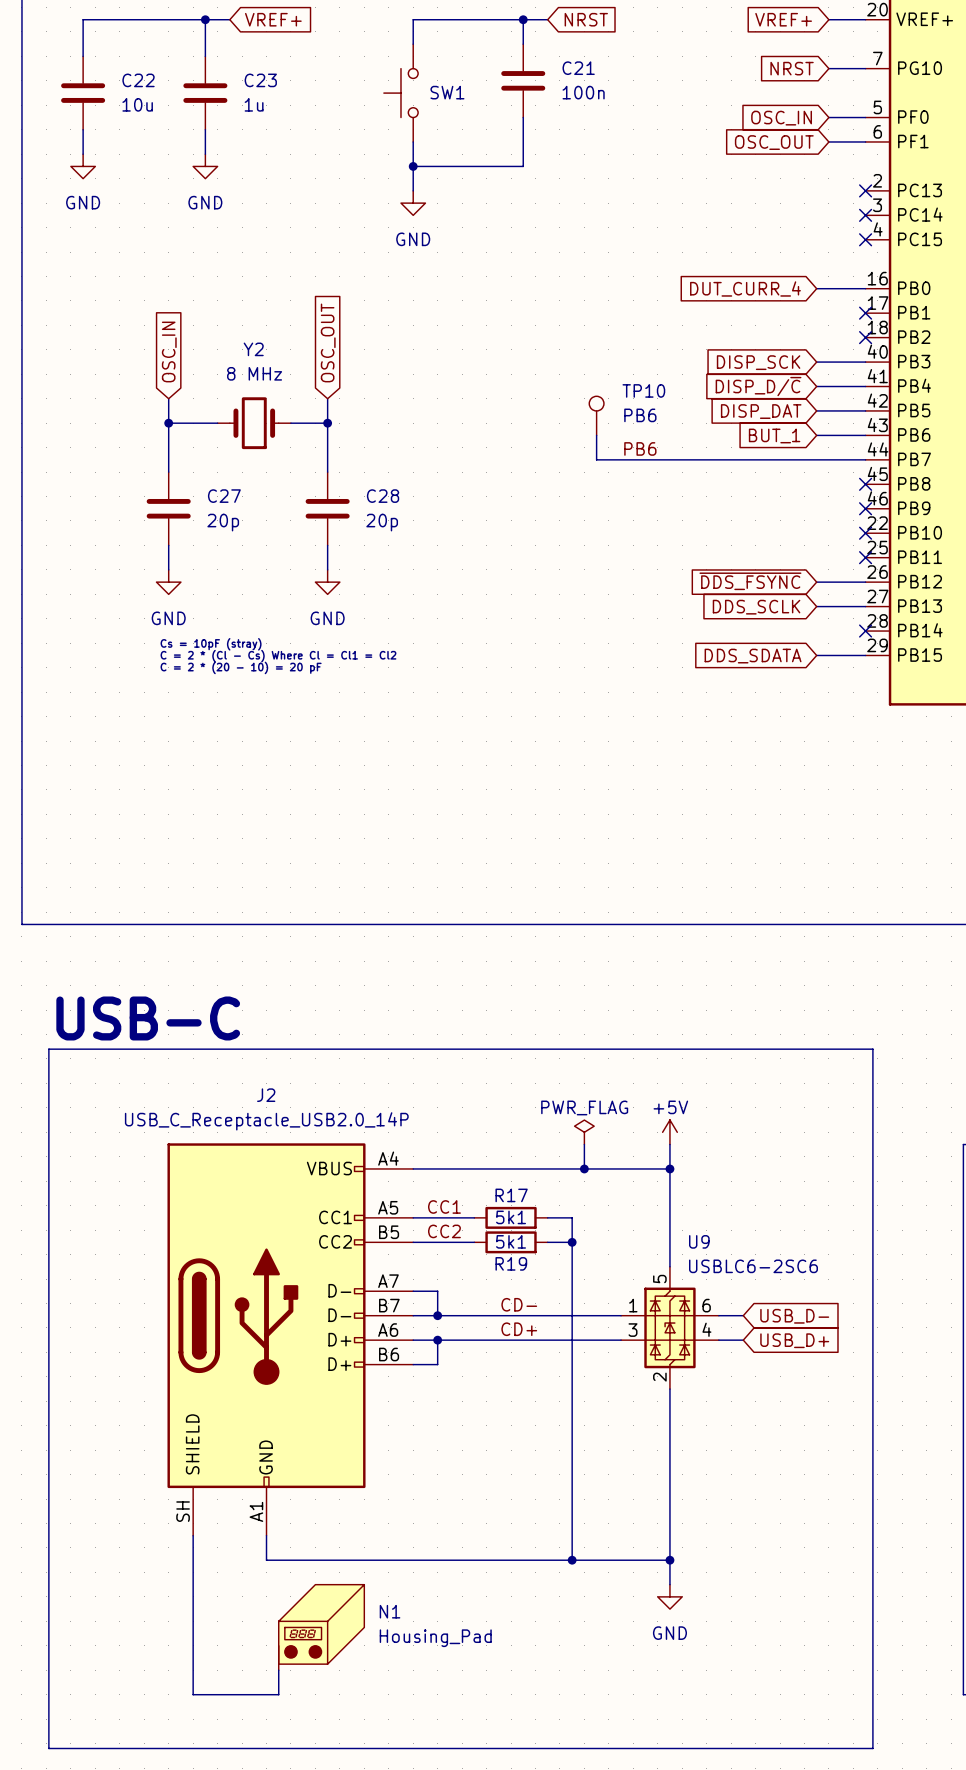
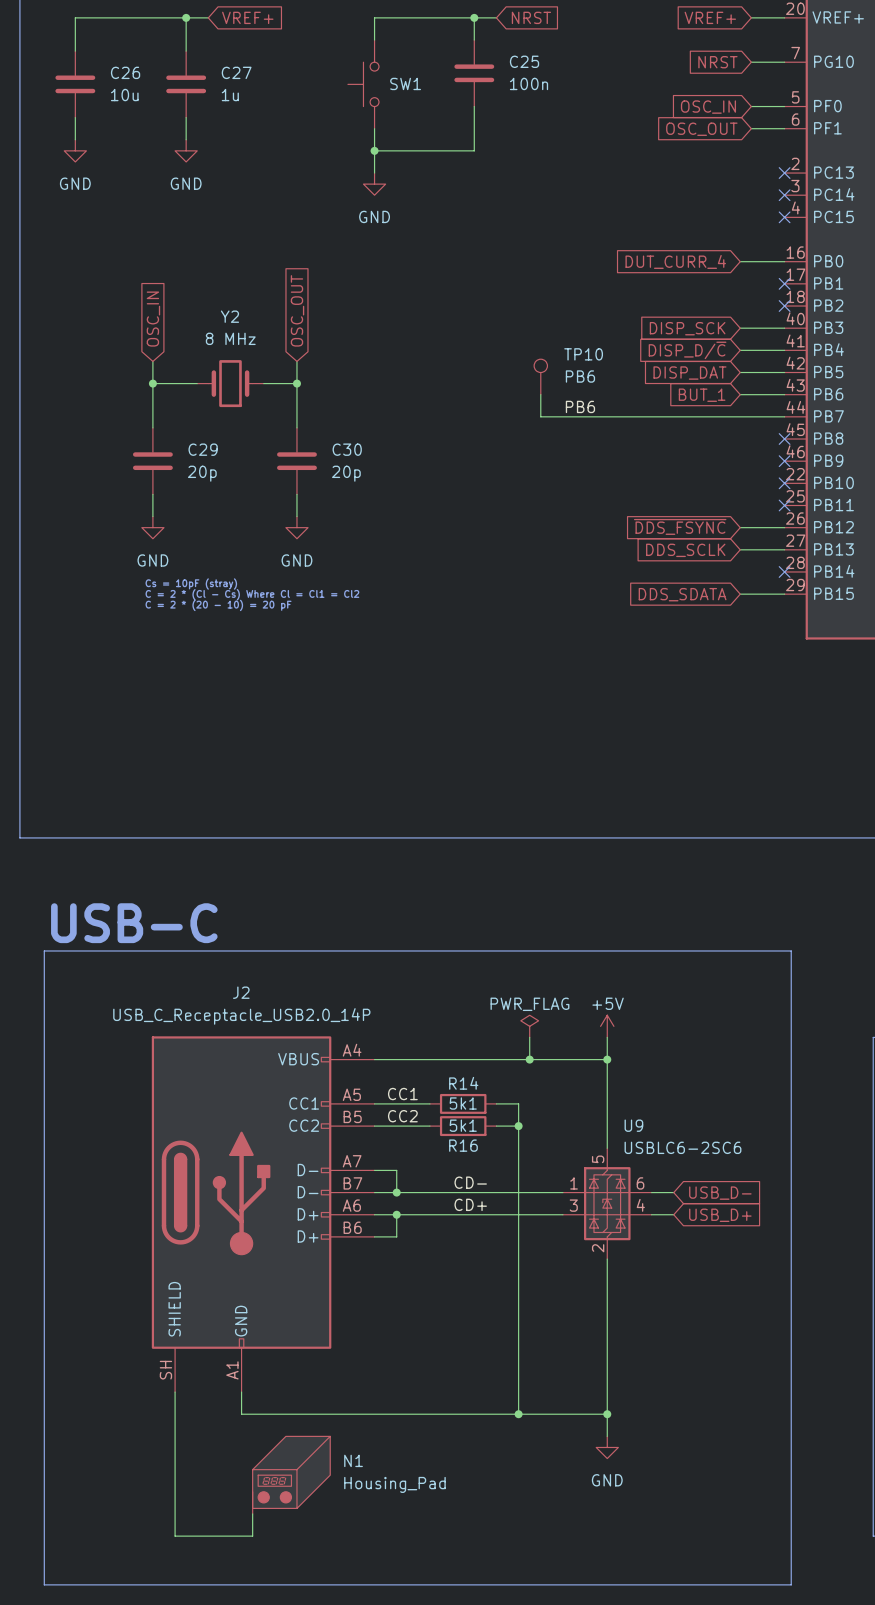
C21 name: C21 (578, 68) -> C25 (524, 61)
C22 name: C22 (138, 80) -> C26 (125, 72)
C23 name: C23 (260, 80) -> C27 (236, 72)
C27 name: C27 (224, 496) -> C29 (203, 449)
C28 name: C28 (383, 496) -> C30 (347, 449)
R17 name: R17 (511, 1195) -> R14 (463, 1083)
R19 name: R19 (511, 1263) -> R16 (463, 1145)

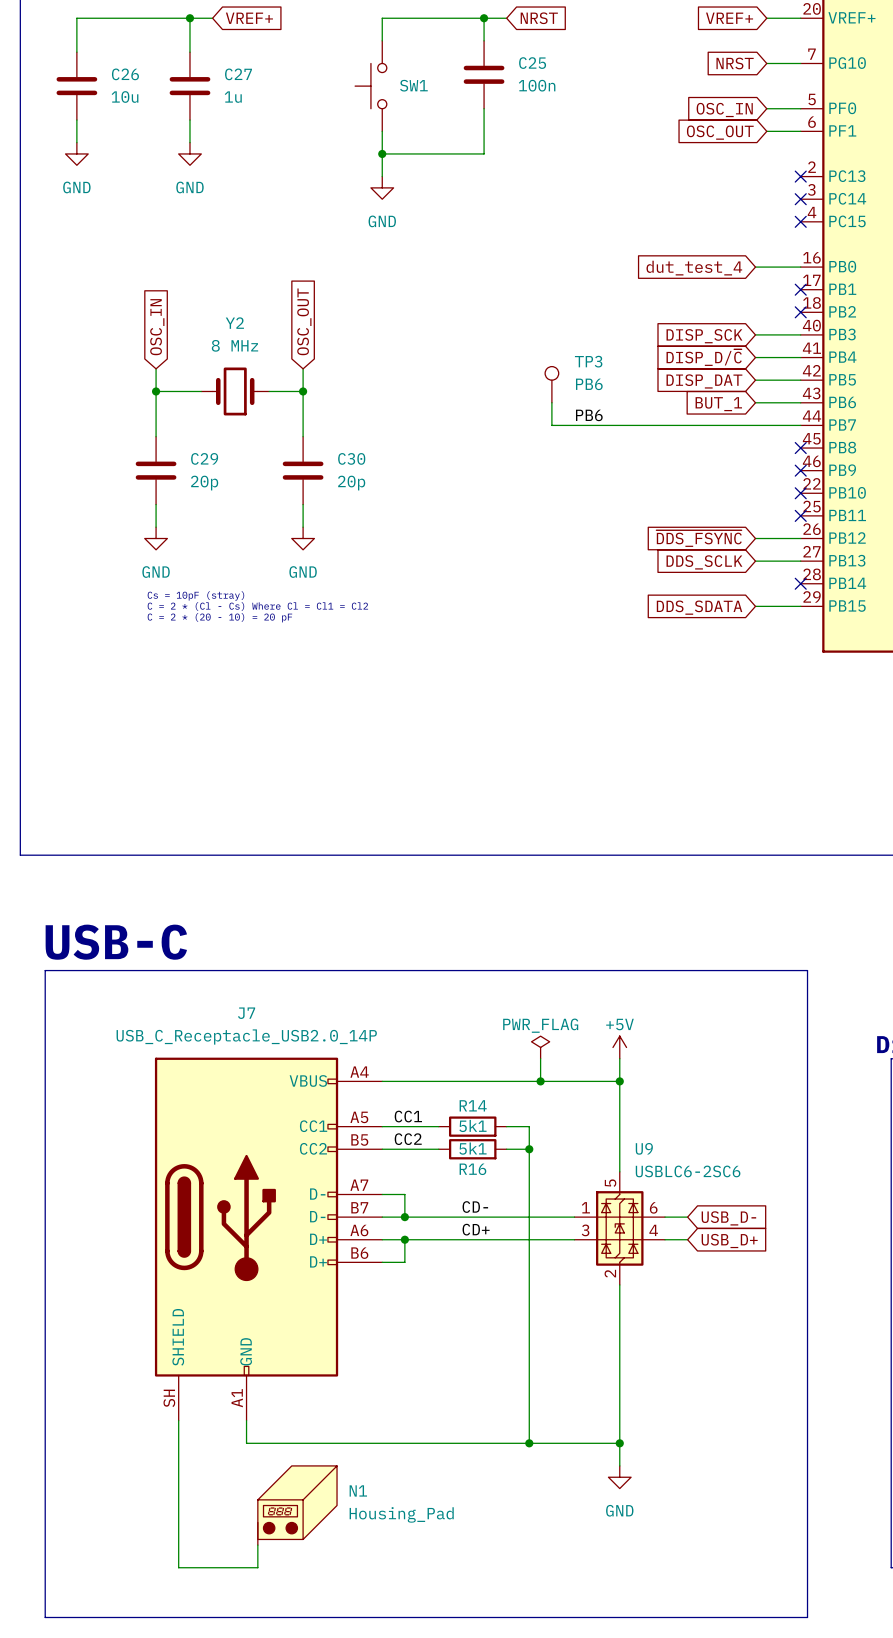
global label: DUT_CURR_4 (675, 261) -> dut_test_4 (694, 268)
TP10 name: TP10 (583, 354) -> TP3 (588, 361)
J2 name: J2 (241, 992) -> J7 (246, 1013)

